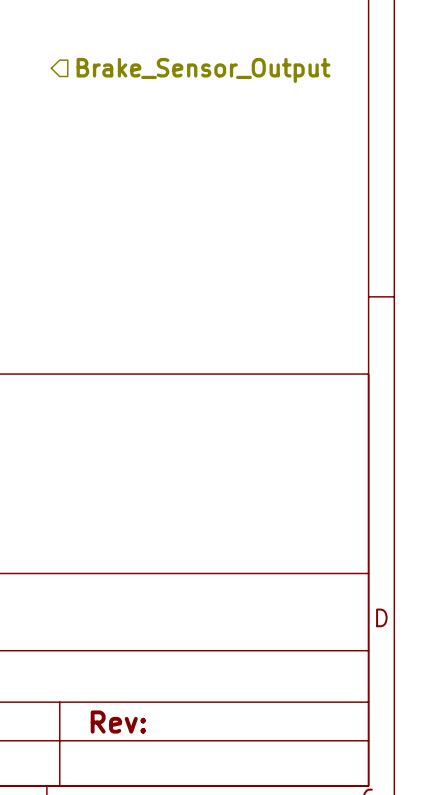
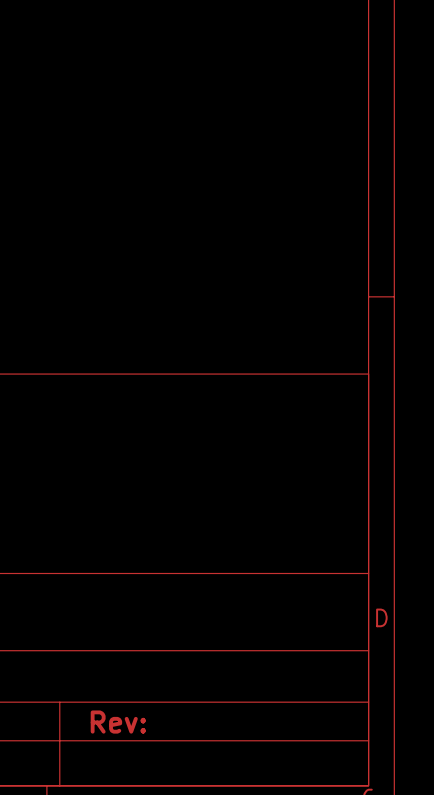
hierarchical label: Brake_Sensor_Output (203, 70) -> none

